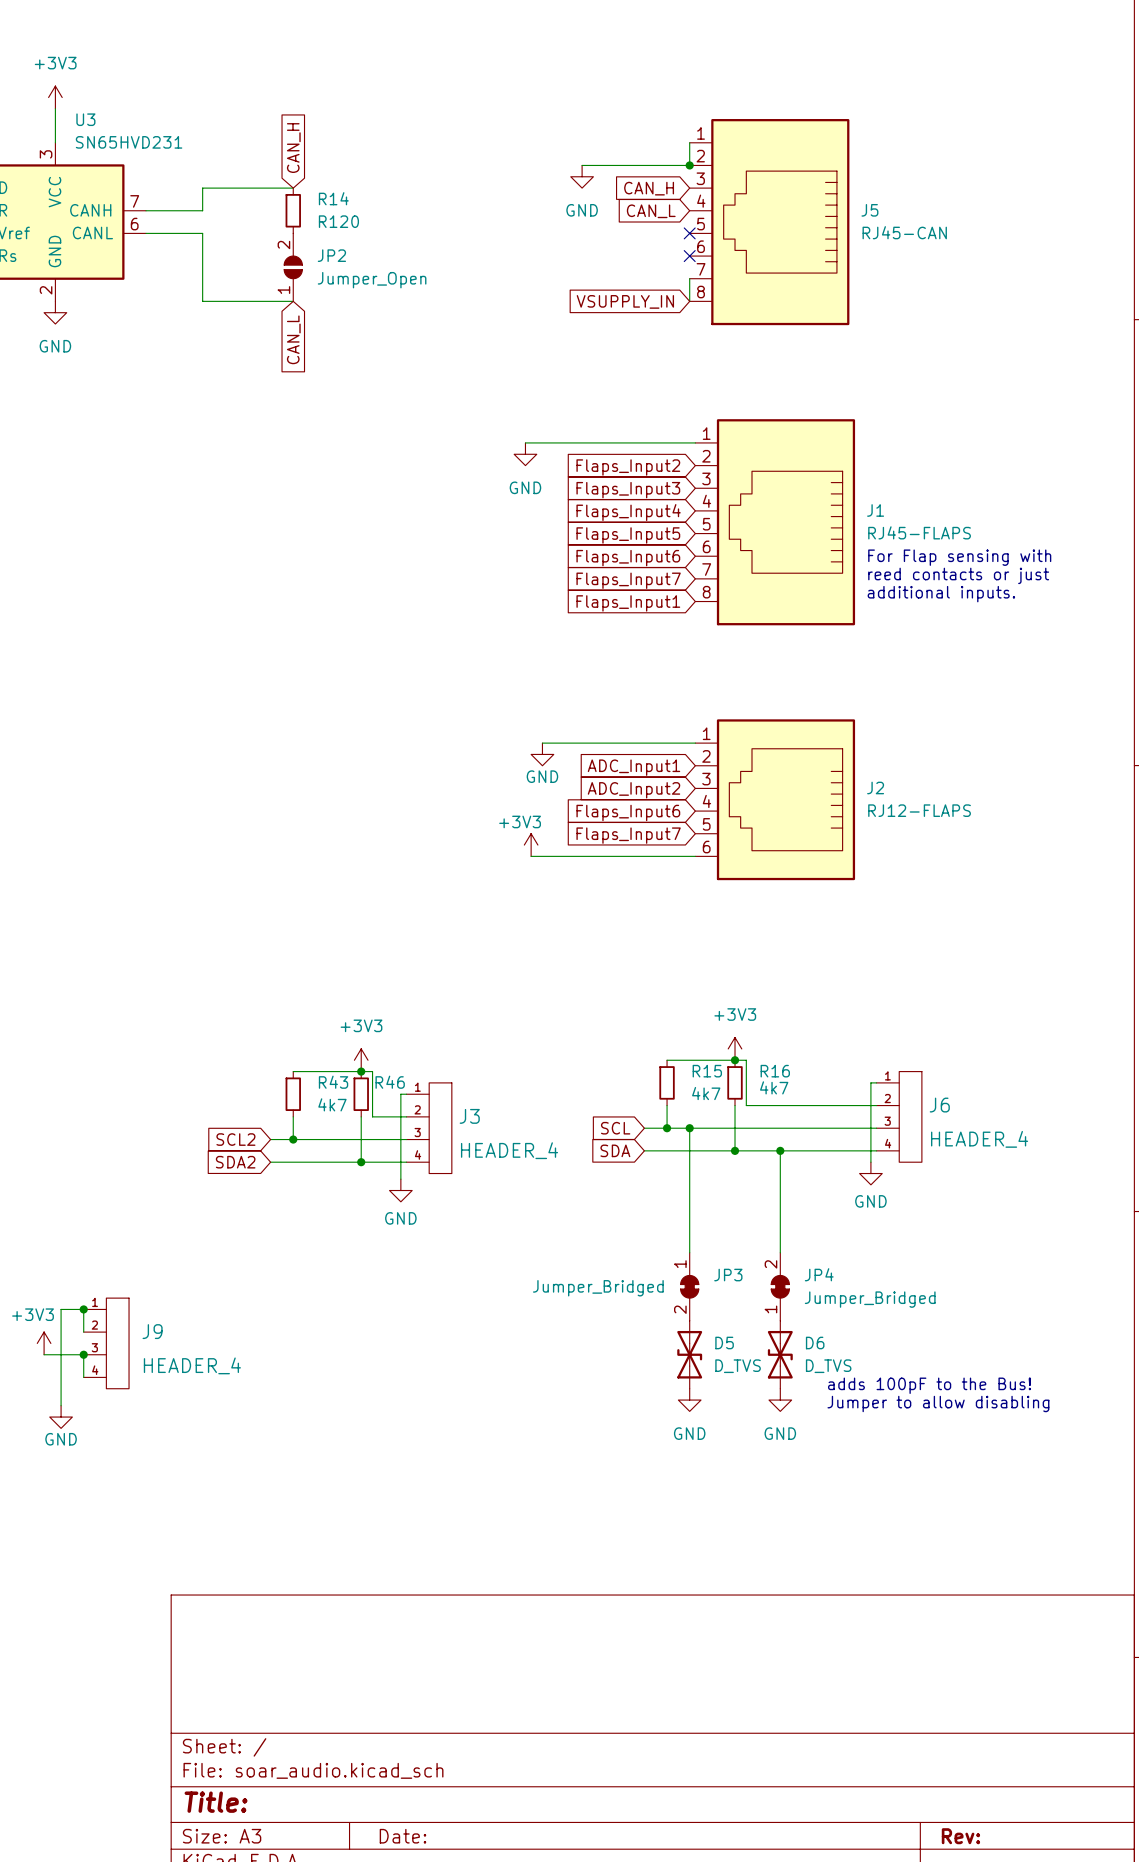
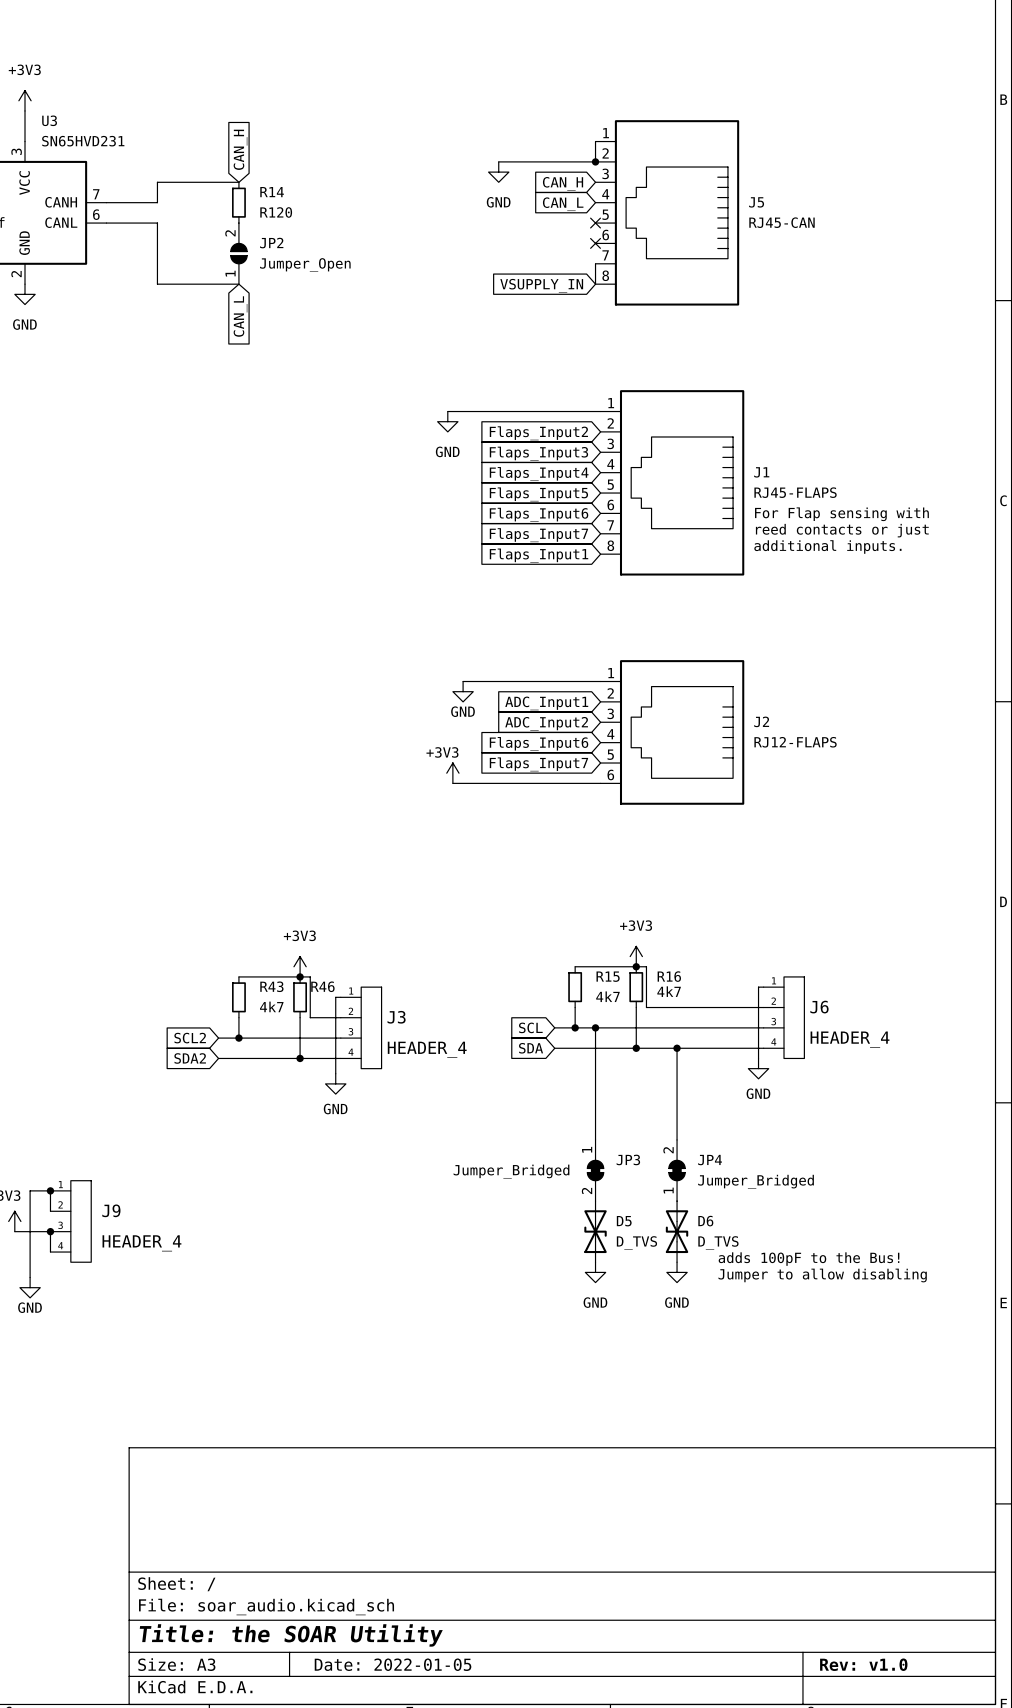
title block: Title: (216, 1802) -> Title: the SOAR Utility (291, 1635)
title block: Date: (402, 1836) -> Date: 2022-01-05 (393, 1664)
title block: Rev: (960, 1836) -> Rev: v1.0 (863, 1664)

